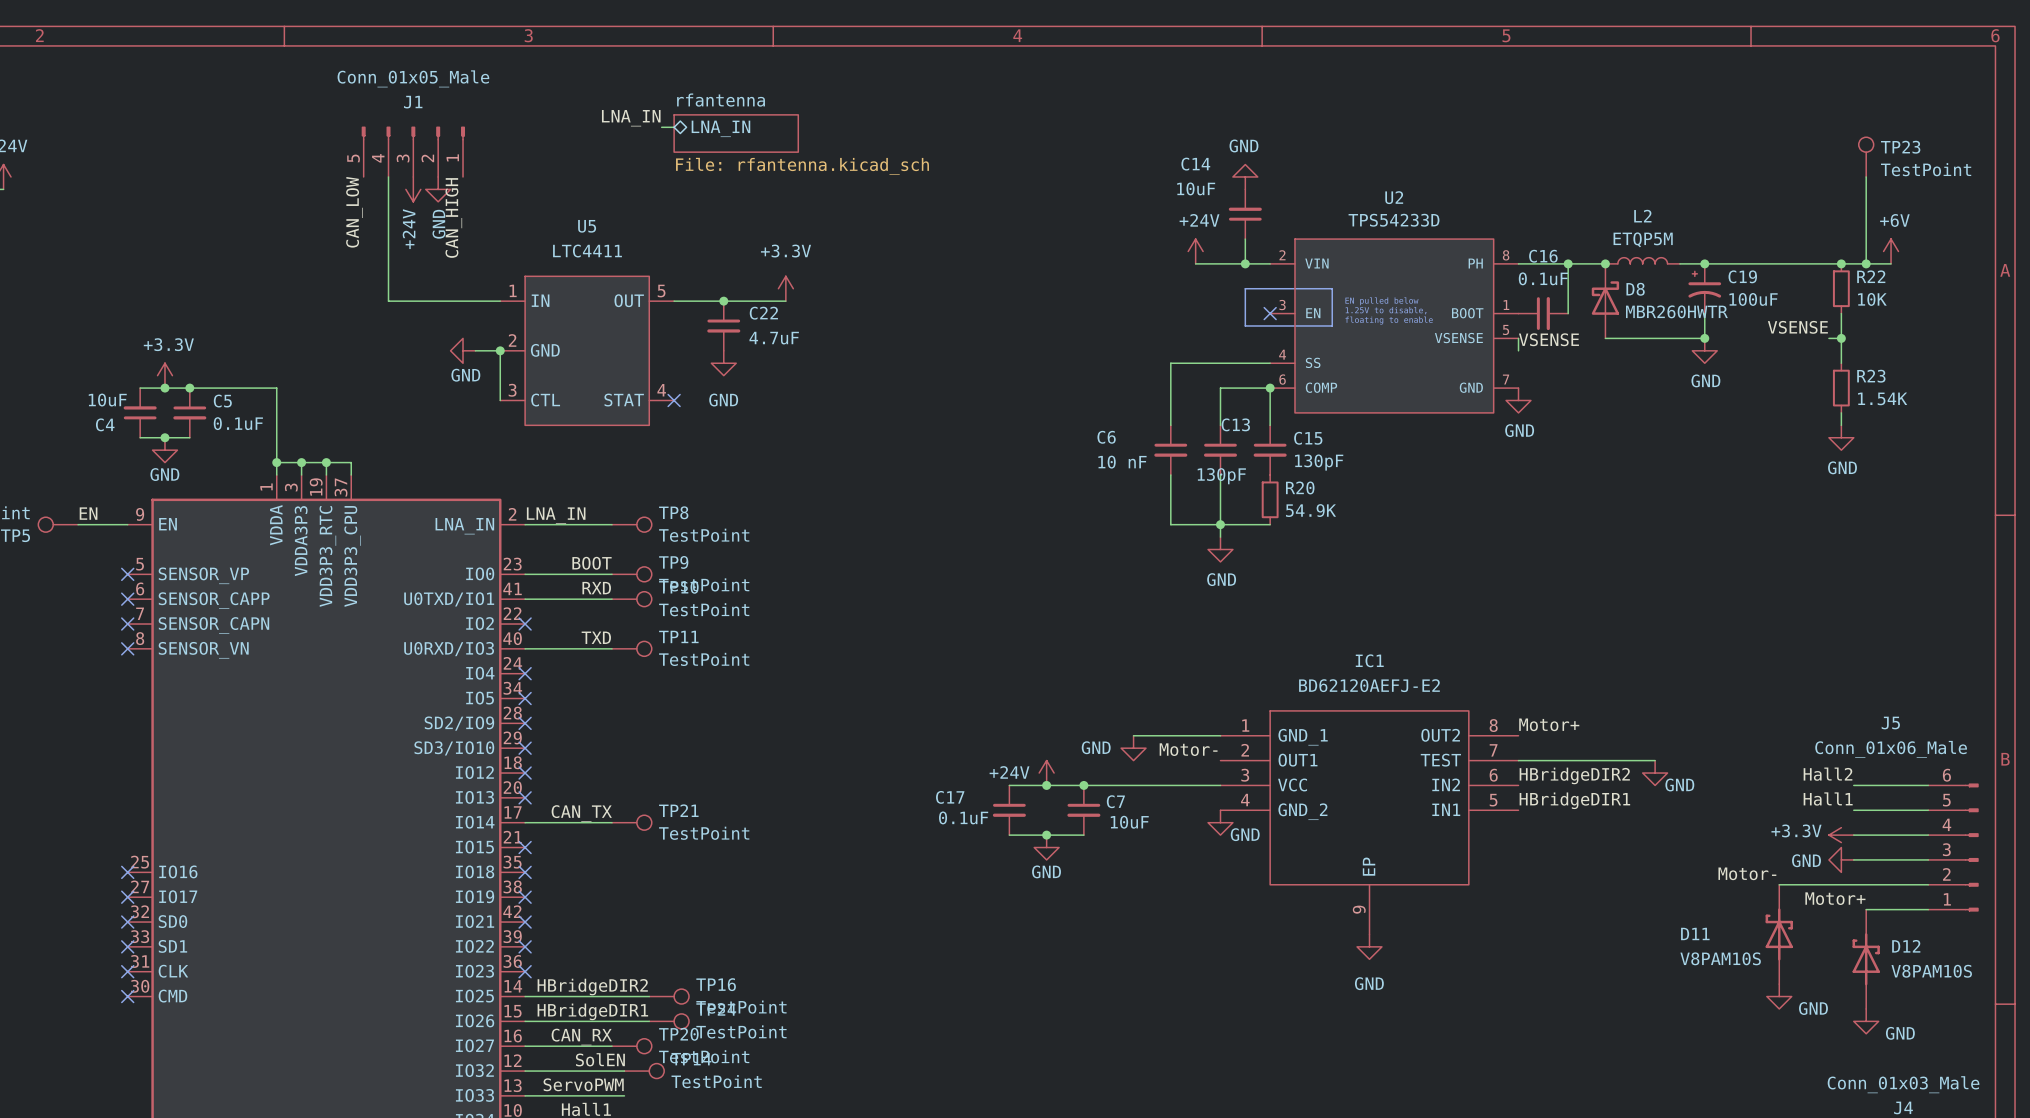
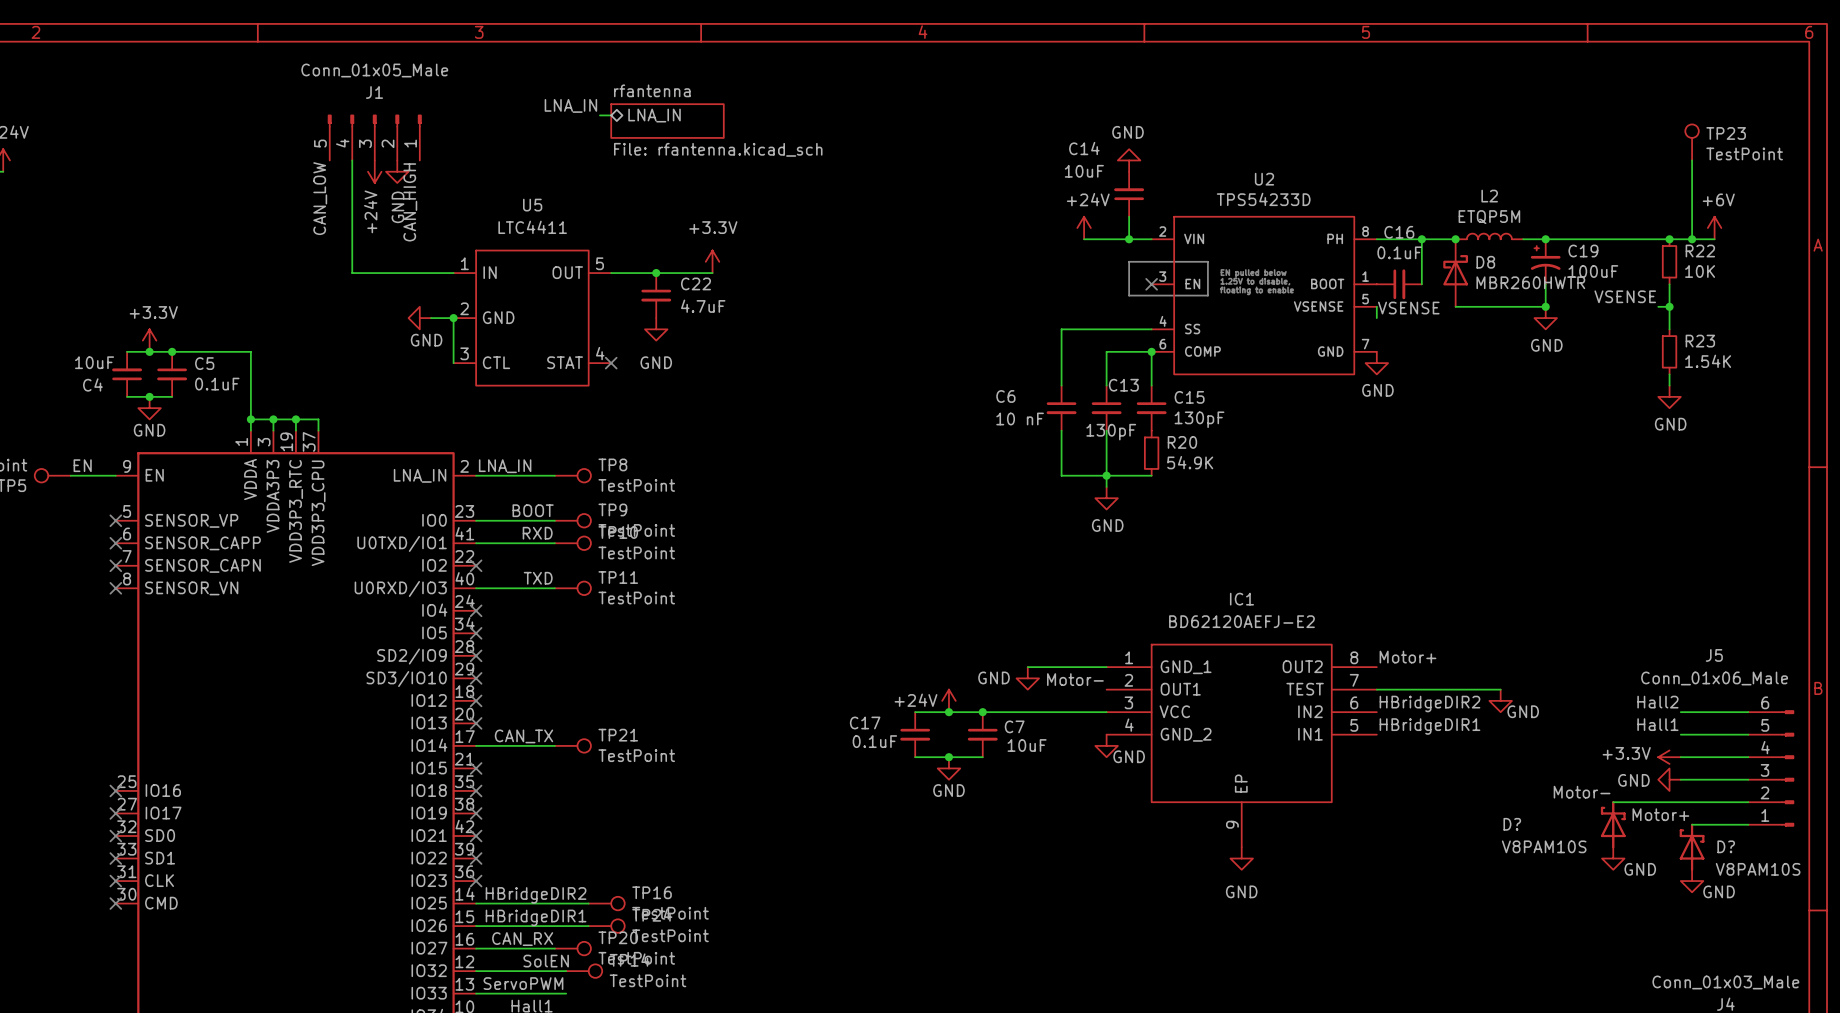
D?: none -> V8PAM10S (1613, 824)
D11: V8PAM10S (1779, 934) -> none
D?: none -> V8PAM10S (1692, 847)
power symbol: none -> GND (1613, 858)
D12: V8PAM10S (1866, 959) -> none
power symbol: none -> GND (1692, 881)
power symbol: GND (1779, 996) -> none
power symbol: GND (1866, 1021) -> none

